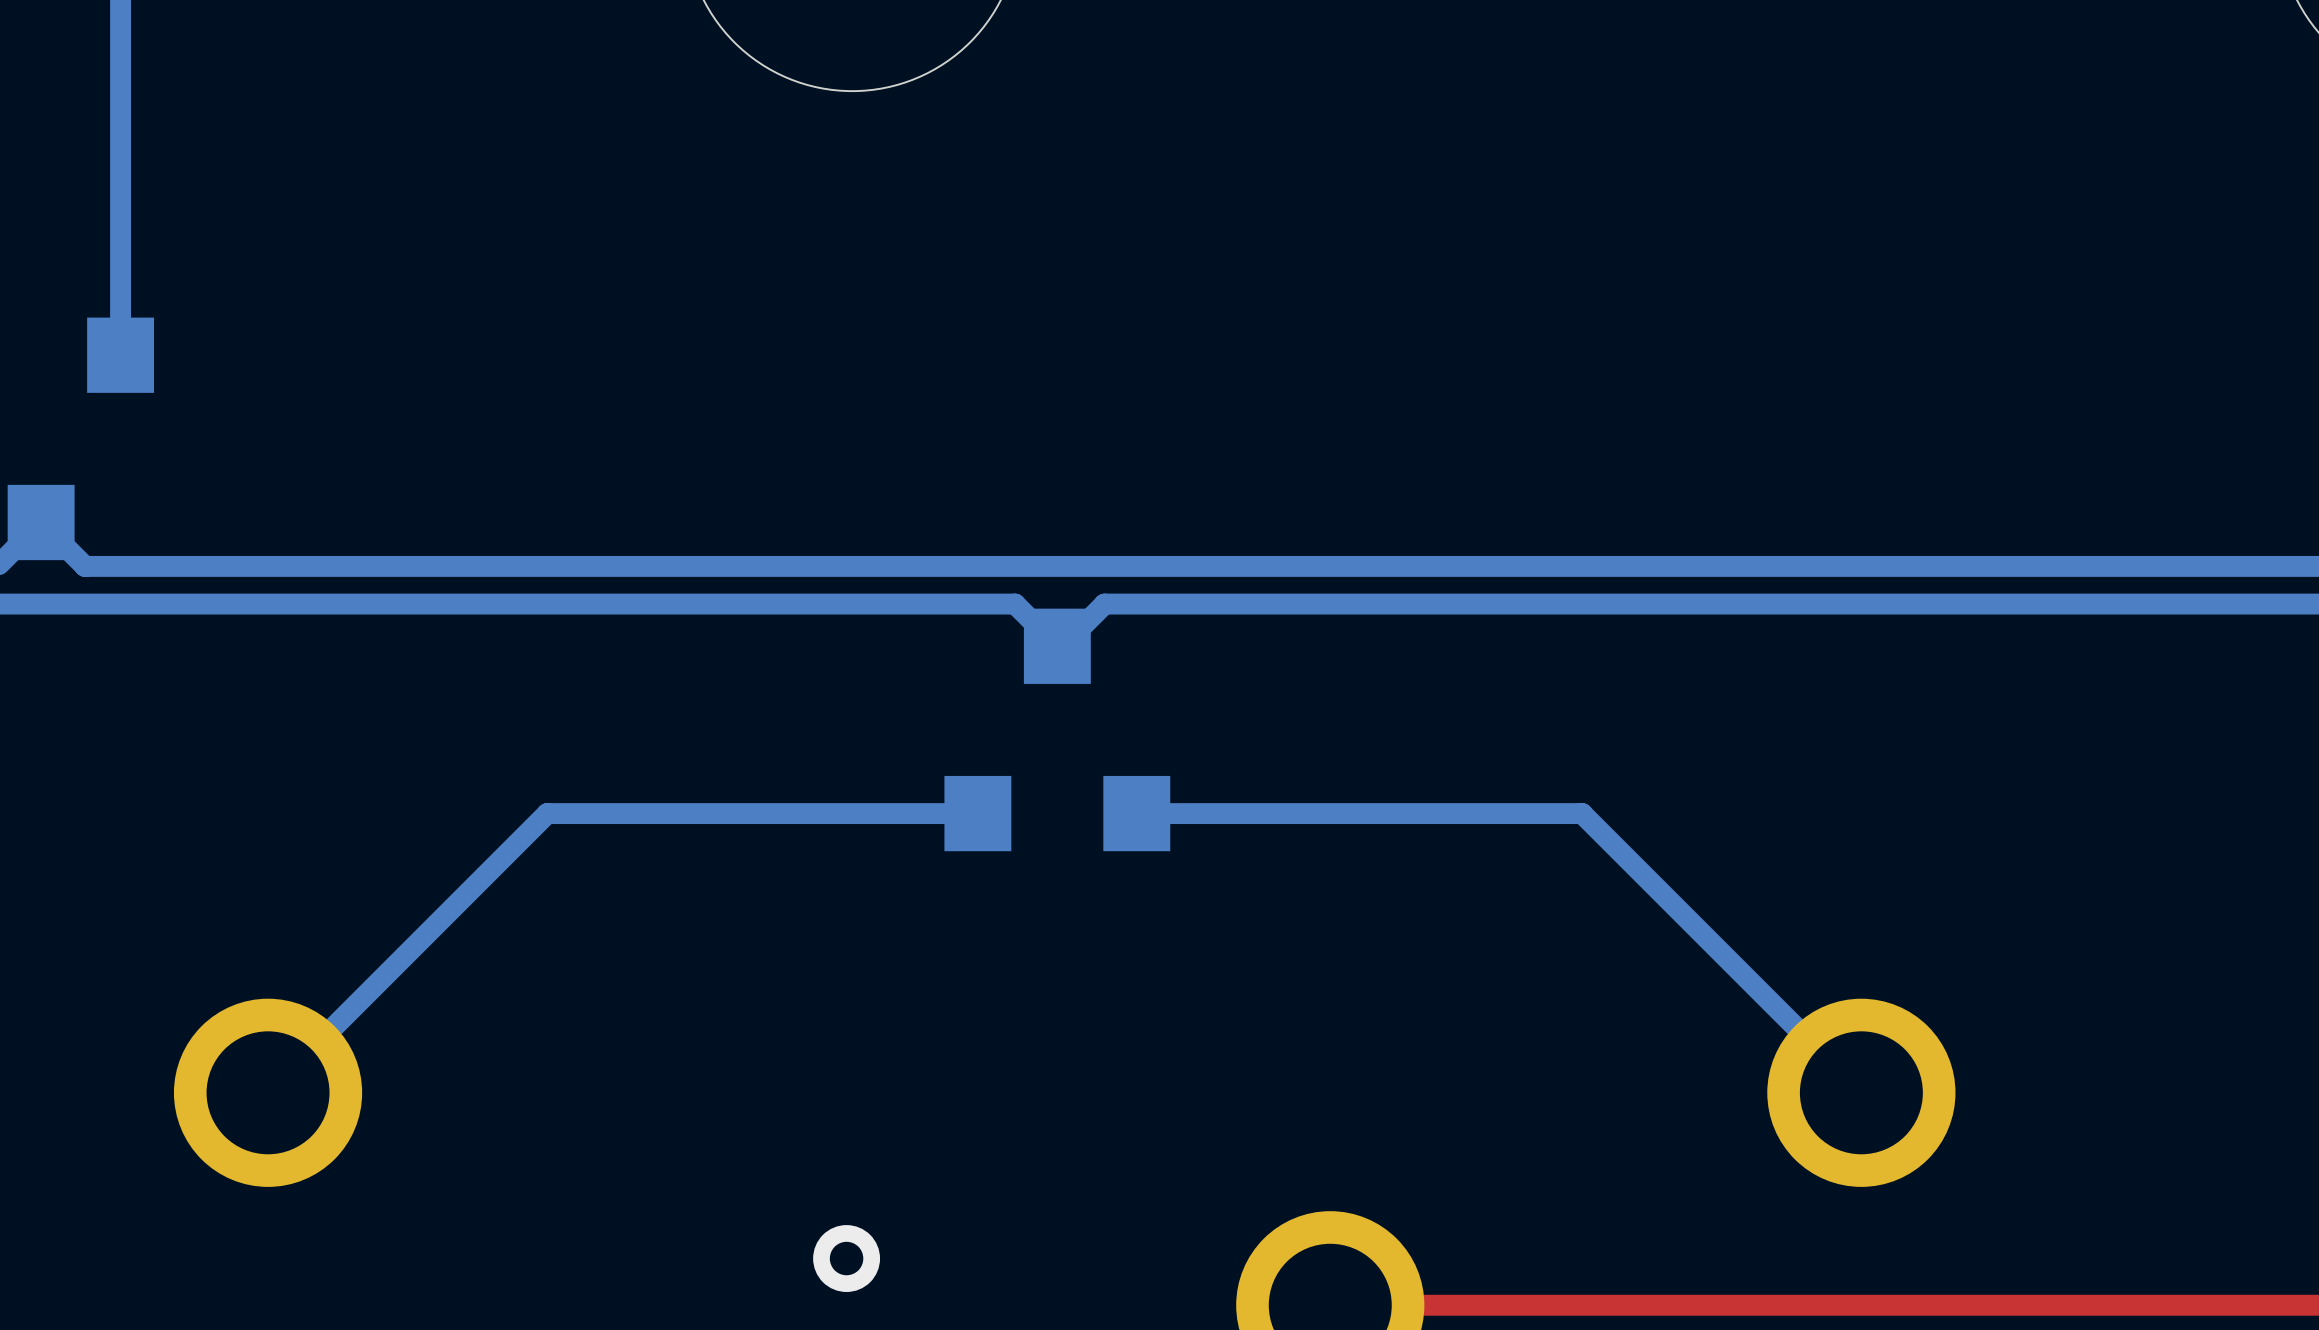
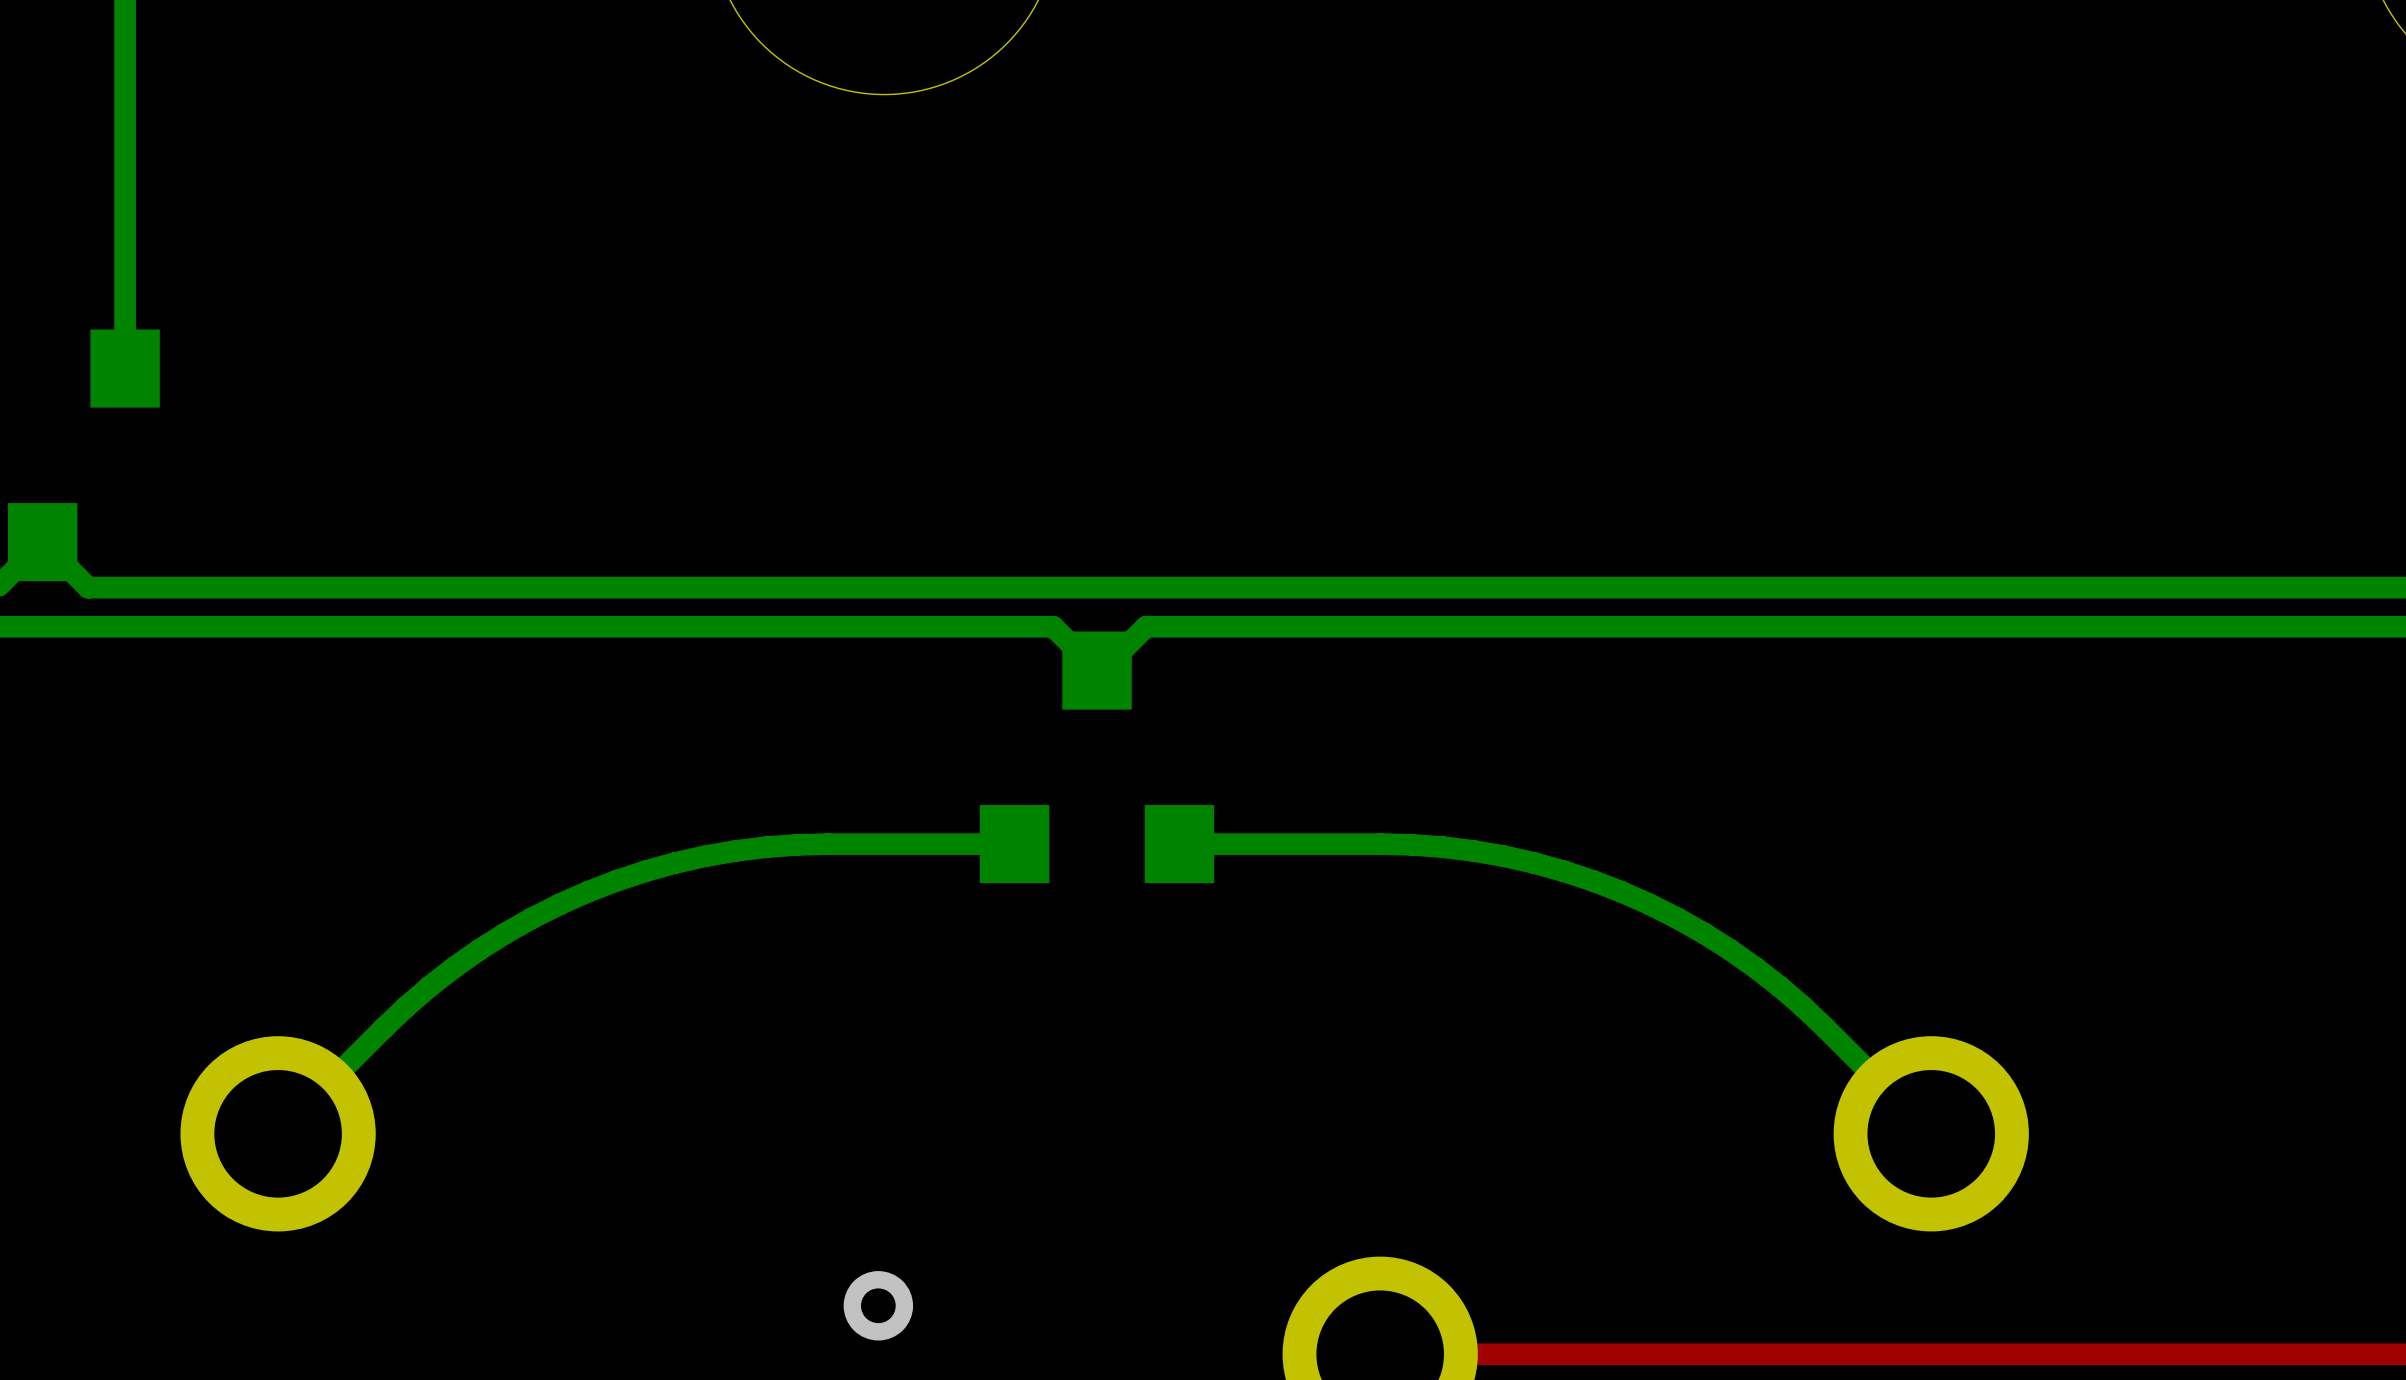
bottom track: (798, 813) (547, 813) (369, 991) -> (828, 844) (766, 847) (705, 856) (645, 871) (587, 891) (531, 918) (478, 950) (429, 986) (383, 1028)
bottom track: (1331, 813) (1582, 813) (1759, 991) -> (1381, 844) (1442, 847) (1503, 856) (1563, 871) (1621, 891) (1677, 918) (1730, 950) (1779, 986) (1825, 1028)

